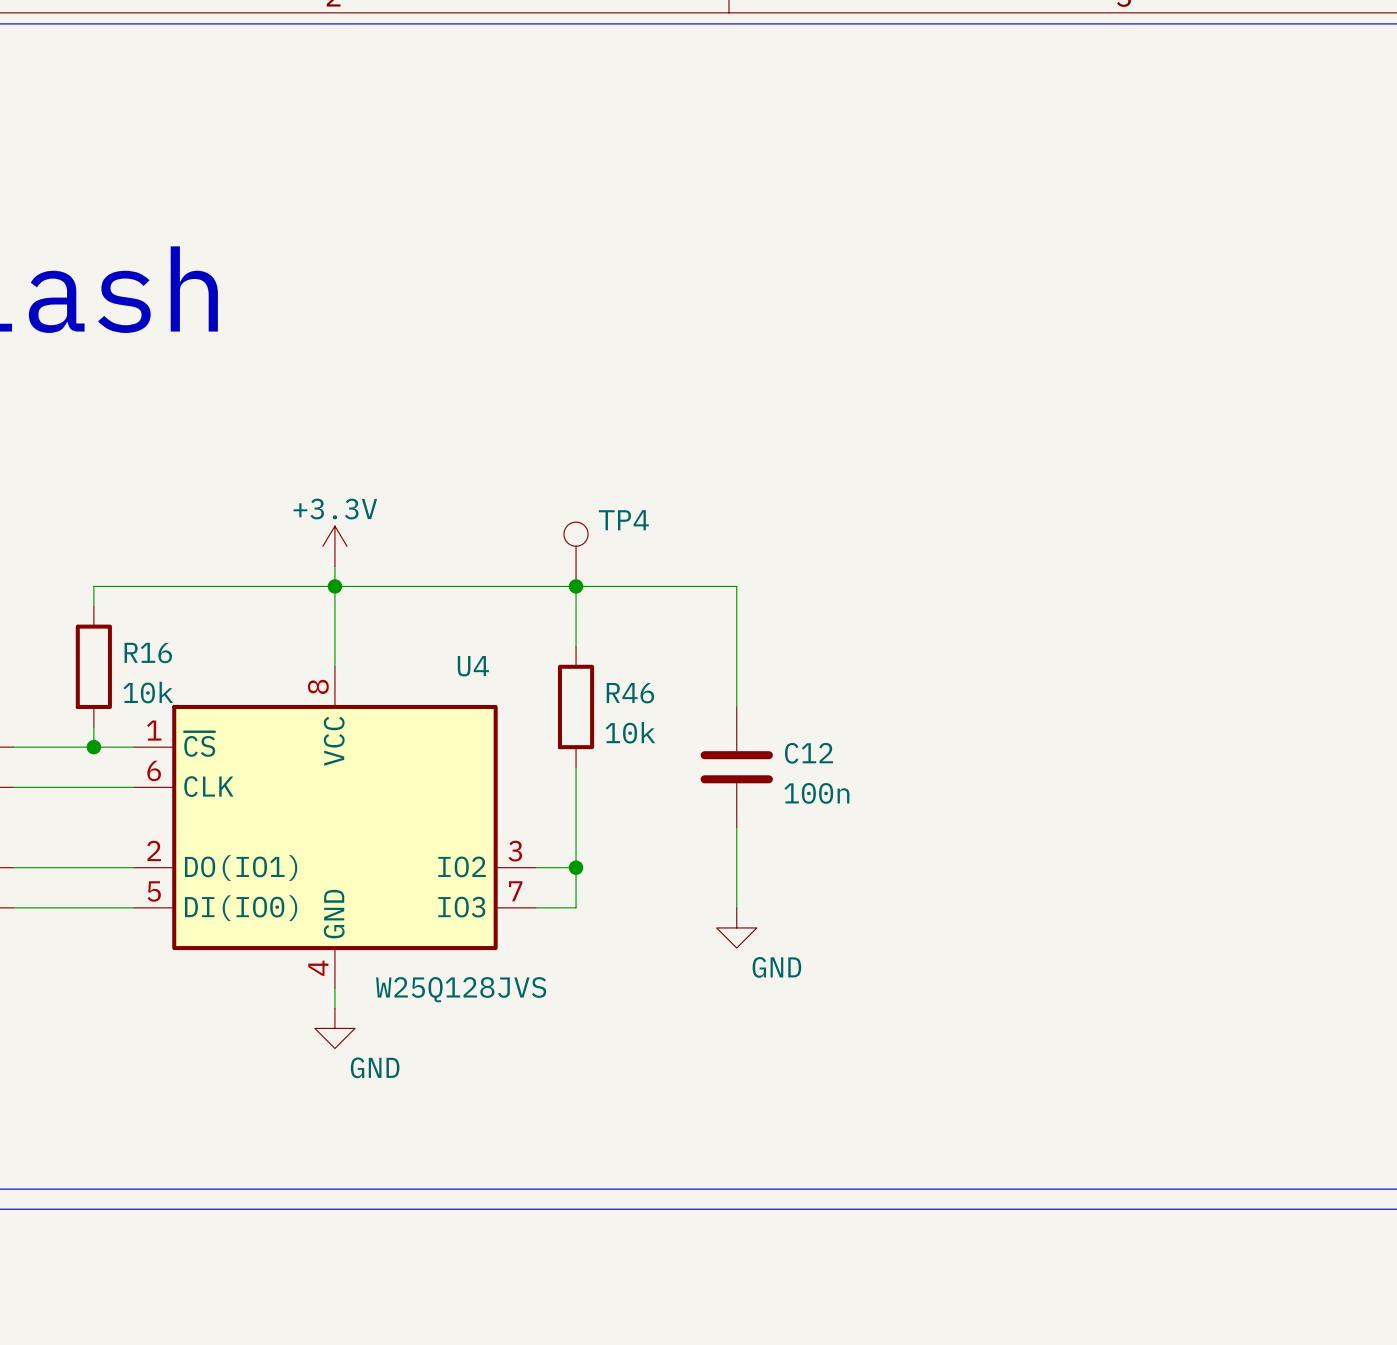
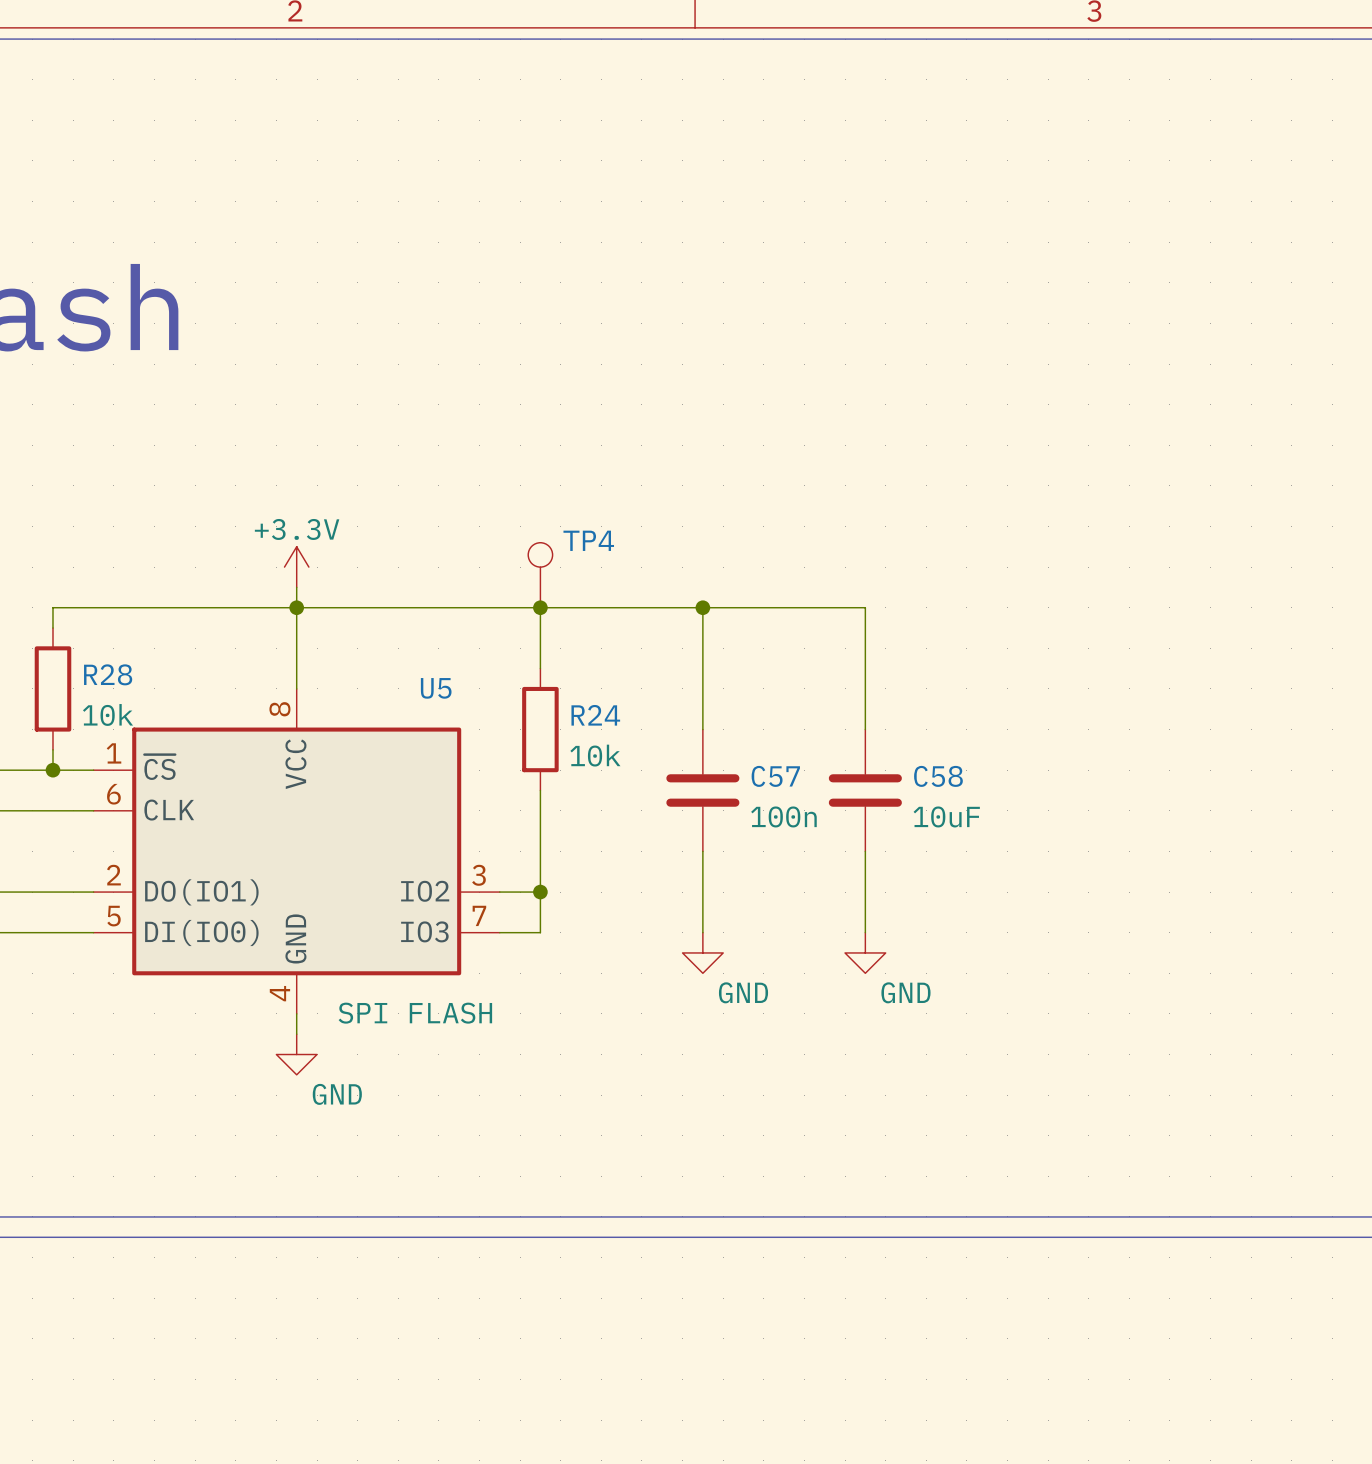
wire: none -> (702, 607) (865, 607) (865, 729)
junction: none -> (702, 607)
R16 name: R16 (148, 653) -> R28 (108, 674)
U4 name: U4 (473, 666) -> U5 (436, 688)
R46 name: R46 (630, 693) -> R24 (595, 715)
C12 name: C12 (808, 753) -> C57 (775, 776)
C58: none -> 10uF (865, 790)
wire: none -> (865, 851) (865, 932)
power symbol: none -> GND (865, 952)
U4 value: W25Q128JVS (461, 989) -> SPI FLASH (415, 1013)

